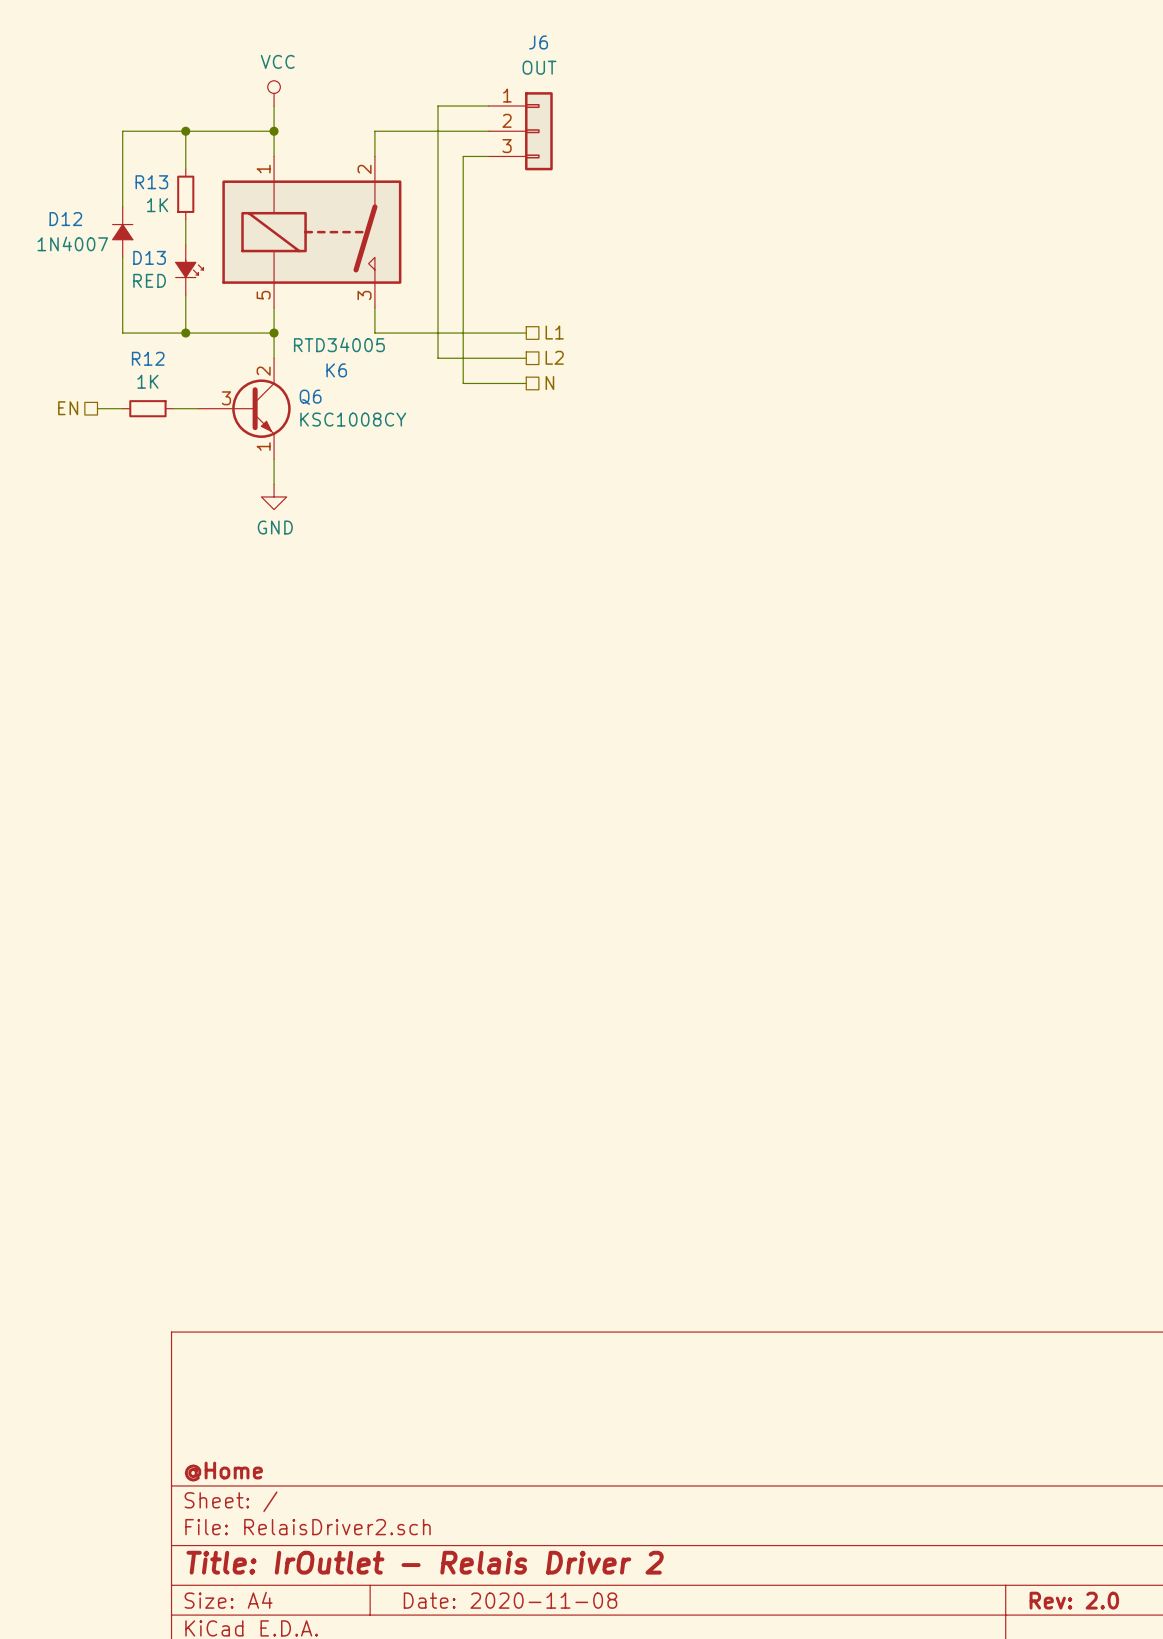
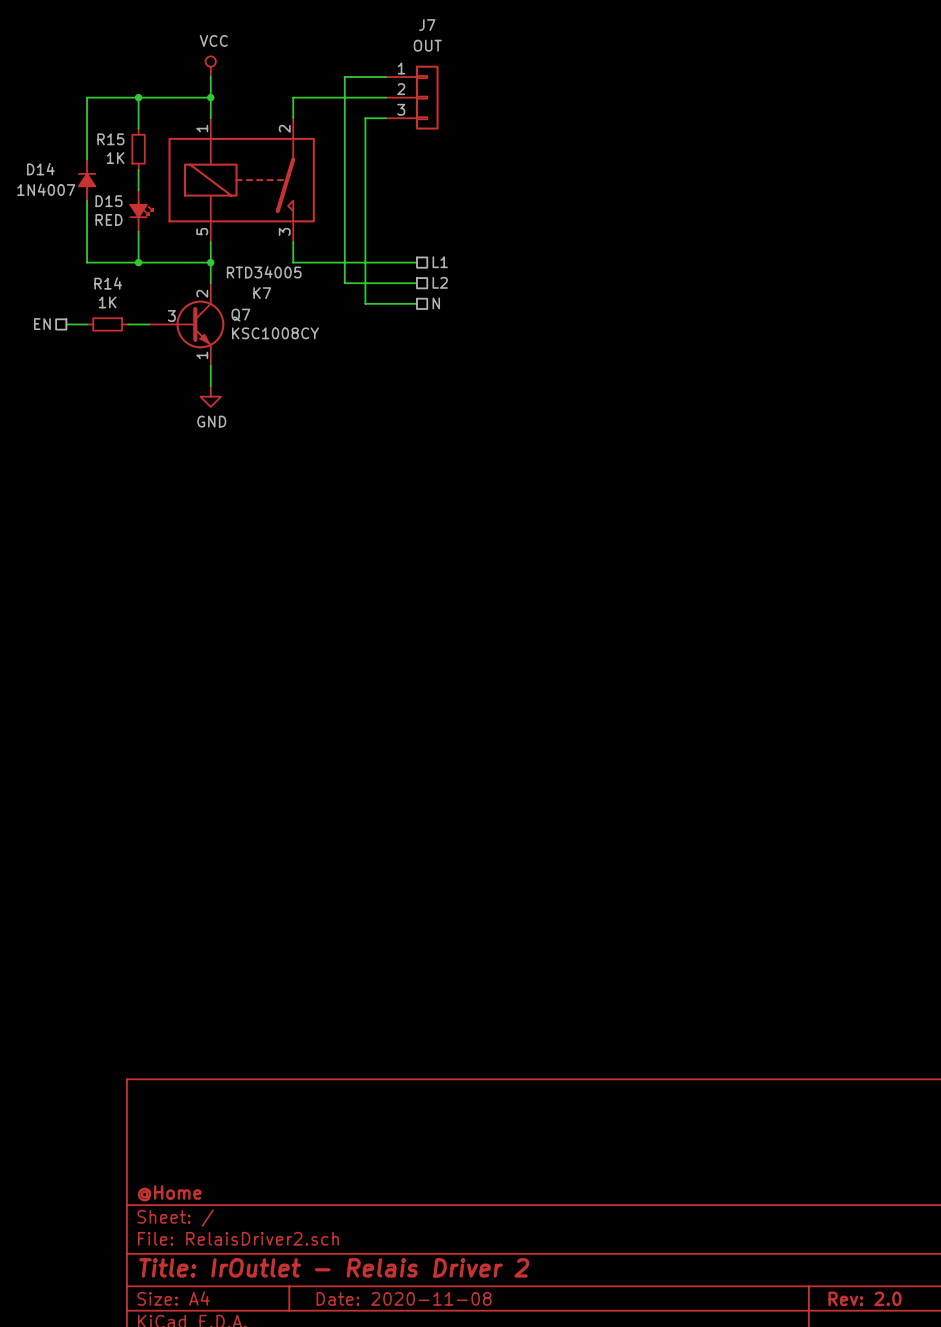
J6 name: J6 (538, 42) -> J7 (427, 25)
R13 name: R13 (151, 182) -> R15 (110, 139)
D12 name: D12 (65, 219) -> D14 (40, 169)
D13 name: D13 (149, 257) -> D15 (109, 201)
R12 name: R12 (148, 358) -> R14 (108, 283)
K6 name: K6 (336, 370) -> K7 (262, 293)
Q6 name: Q6 (310, 397) -> Q7 (240, 315)

